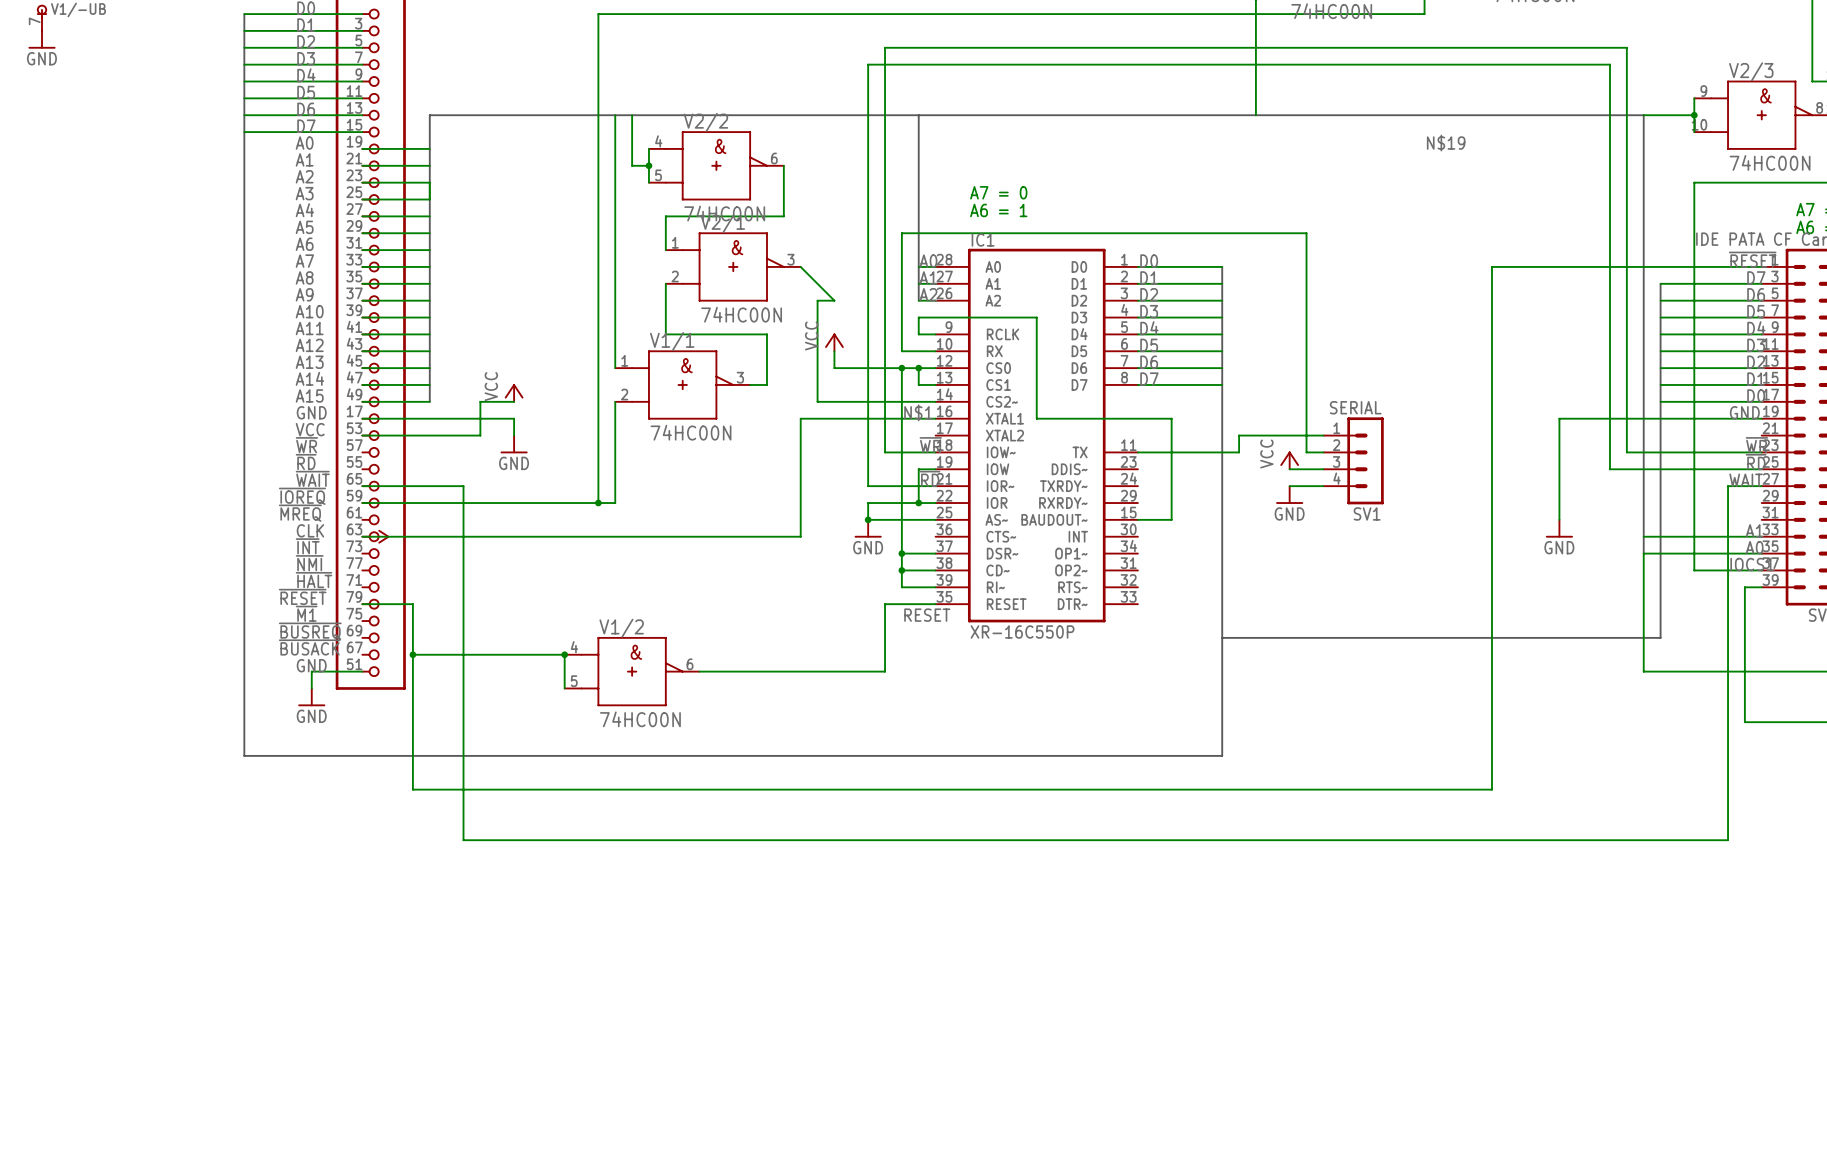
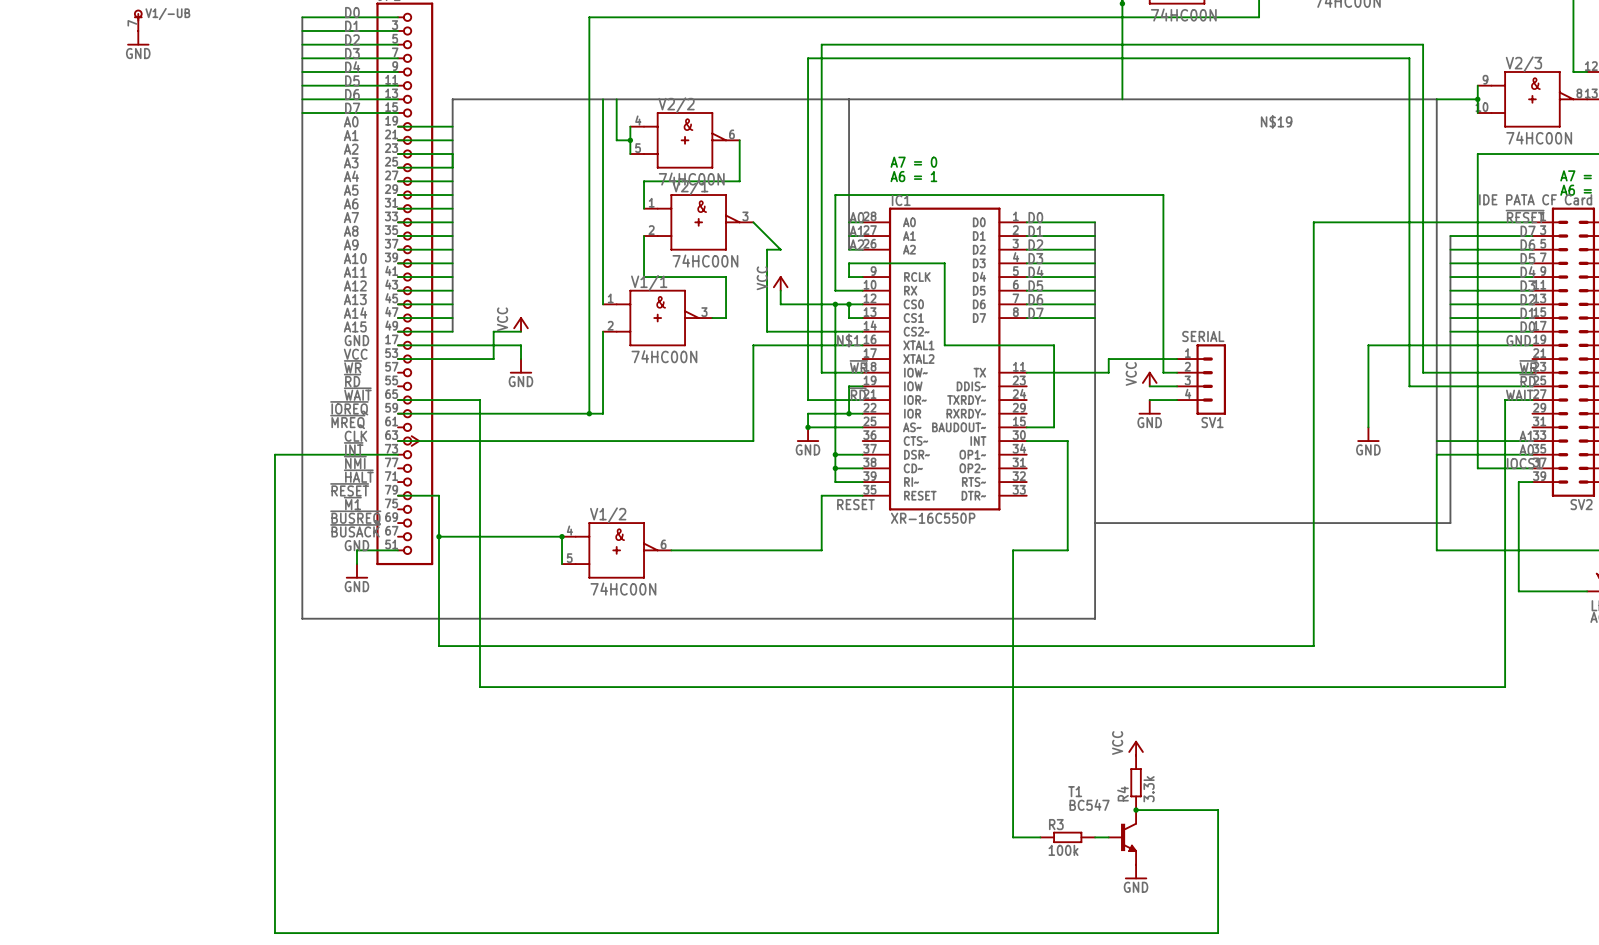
wire: none -> (1026, 441) (1067, 441) (1067, 550) (1013, 550) (1013, 837) (1040, 837)
wire: none -> (397, 454) (274, 454) (274, 933) (1218, 933) (1218, 810) (1136, 810)
power symbol: none -> VCC (1136, 748)
R4: none -> 3.3k (1136, 782)
junction: none -> (1136, 810)
R3: none -> 100k (1067, 837)
wire: none -> (1095, 837) (1108, 837)
T1: none -> BC547 (1122, 837)
power symbol: none -> GND (1136, 871)

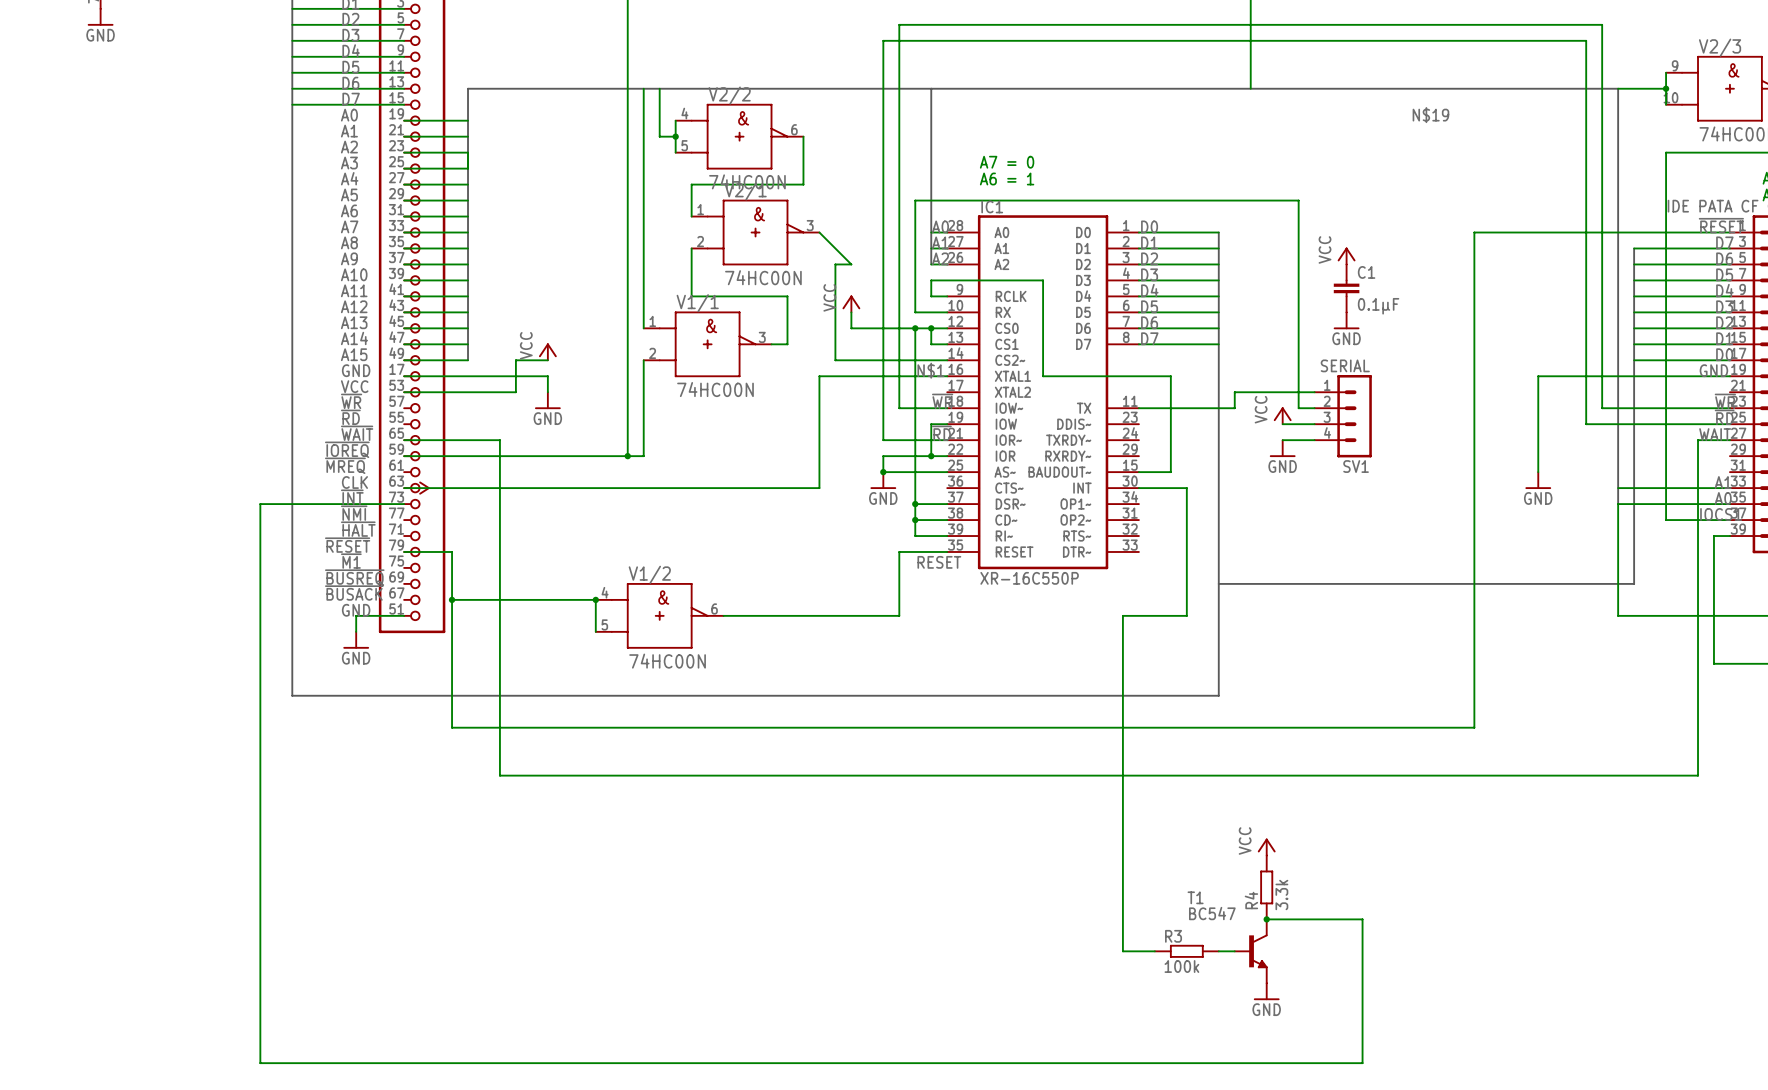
power symbol: none -> VCC (1346, 256)
C1: none -> 0.1µF (1346, 288)
power symbol: none -> GND (1346, 320)

